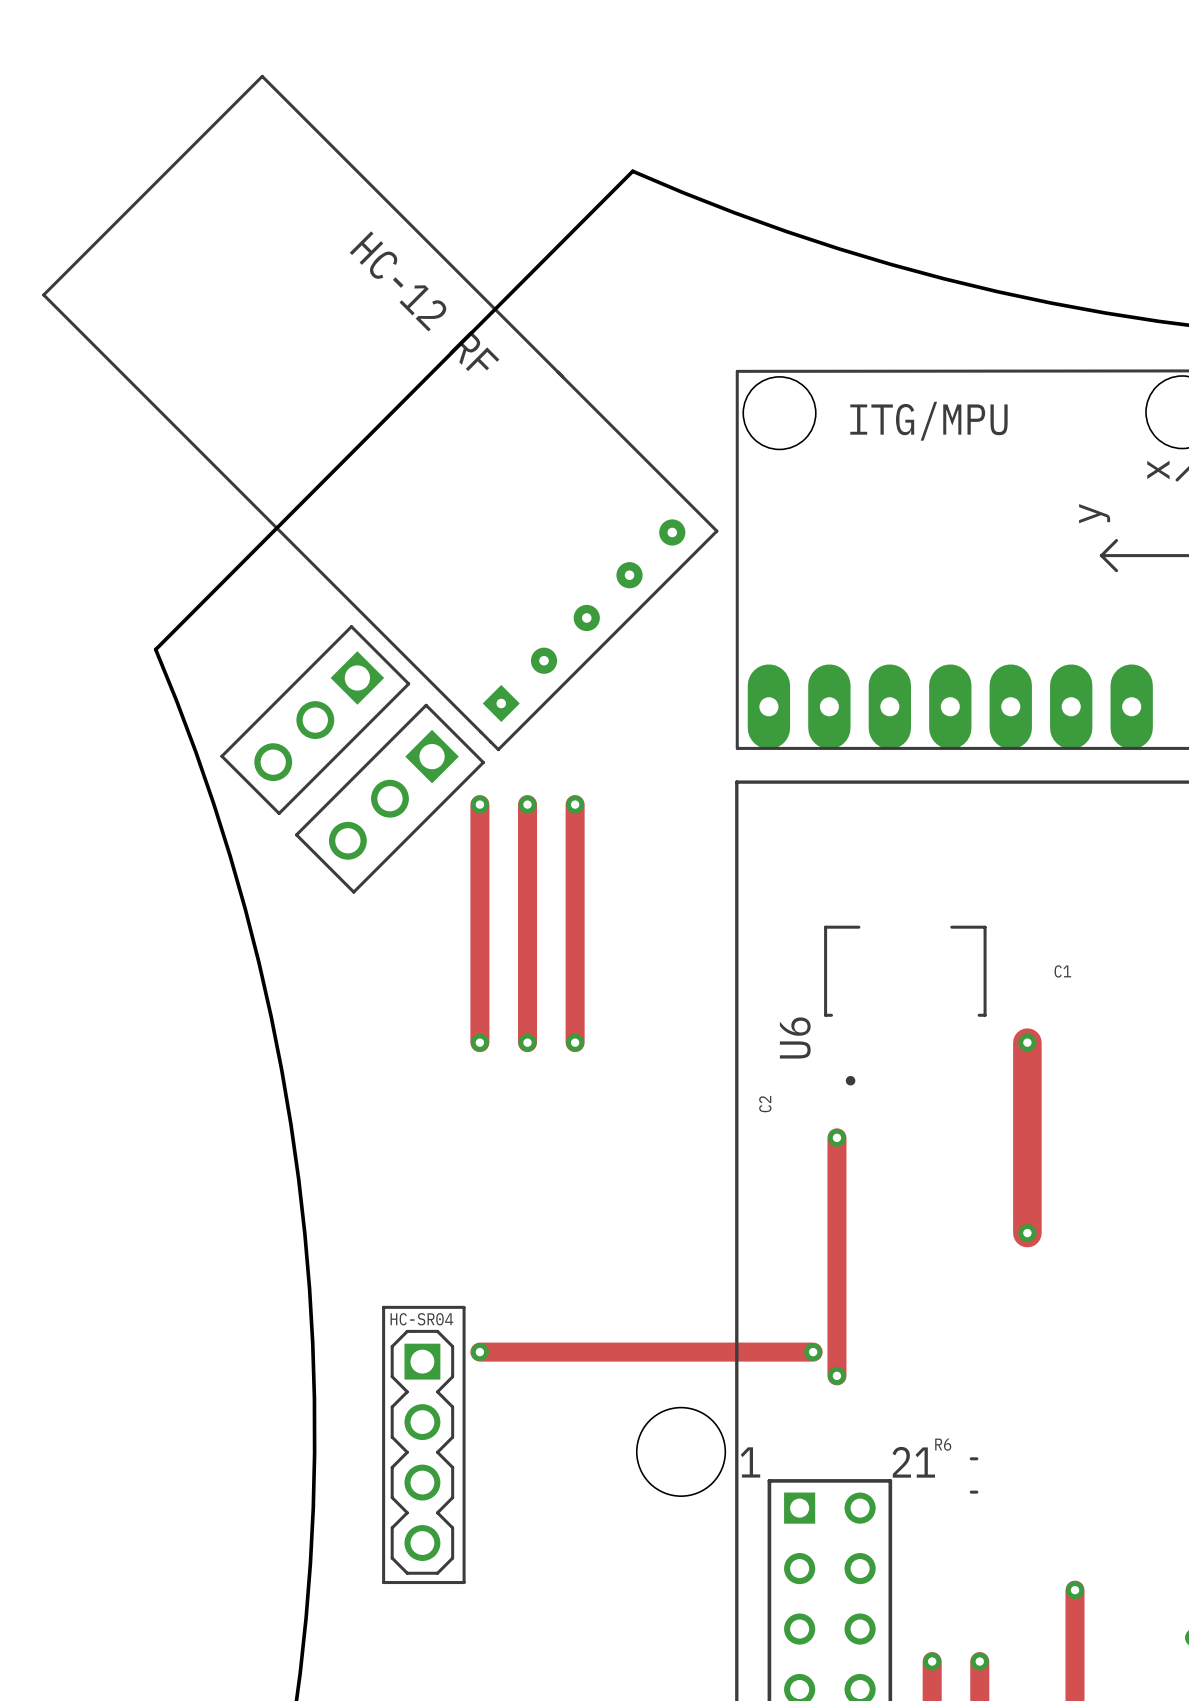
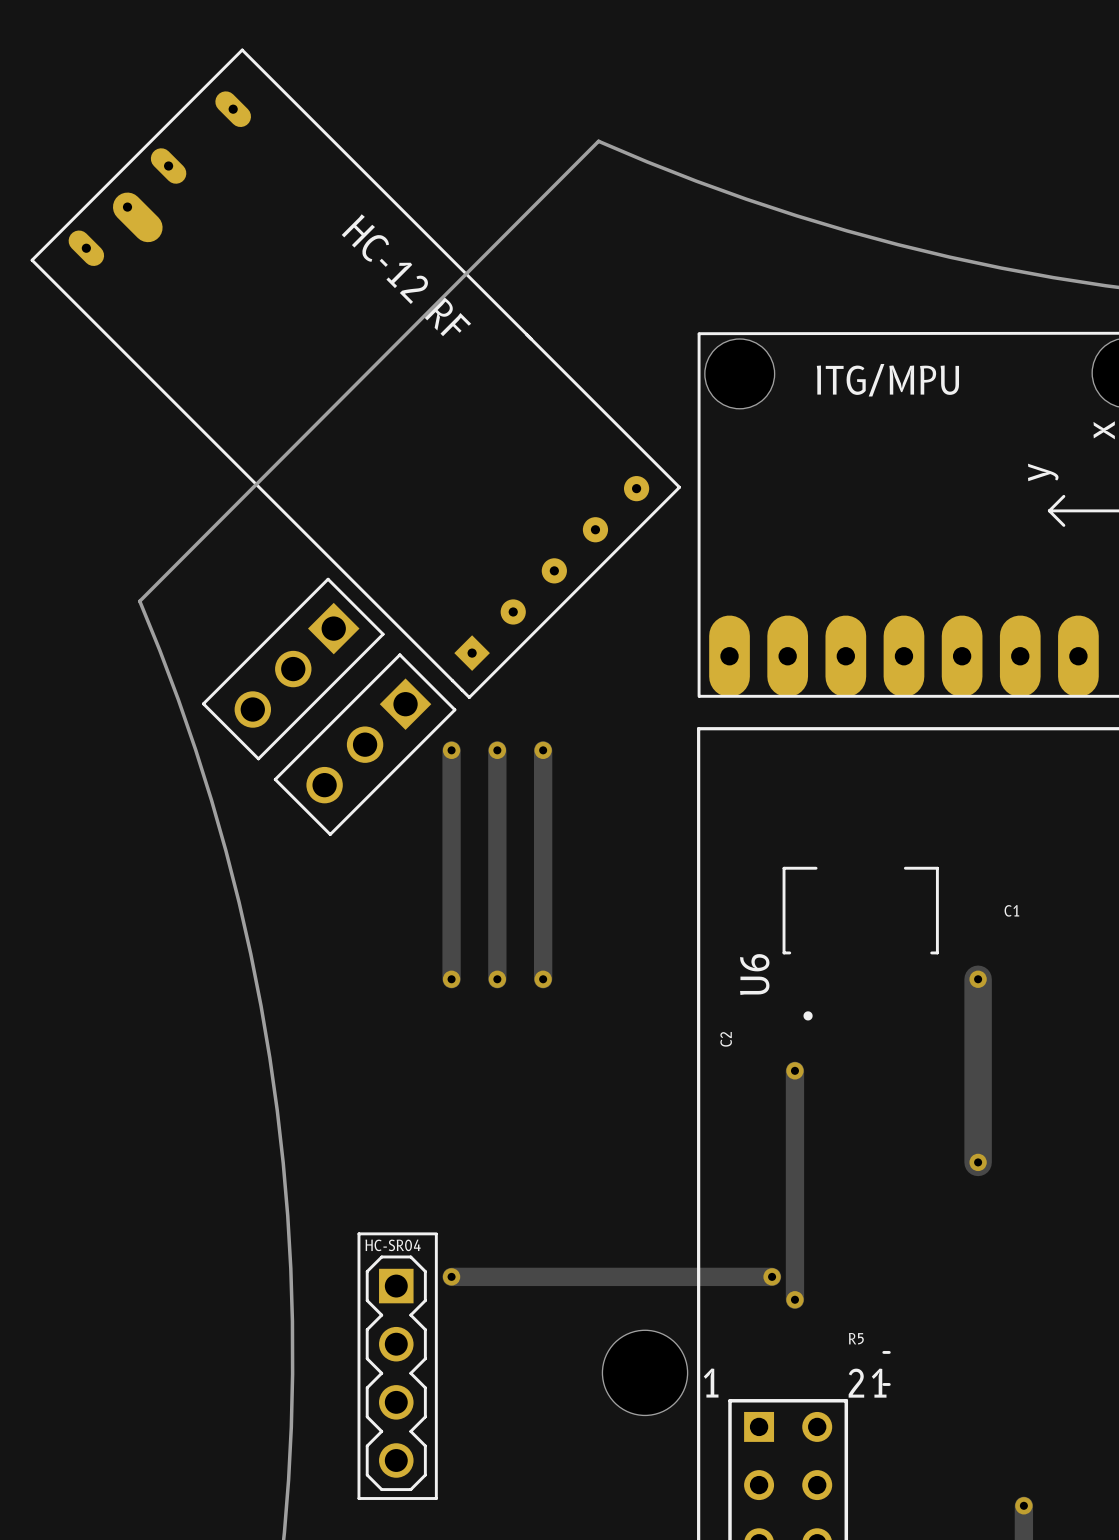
part footprint: [42, 74, 719, 752] -> [30, 48, 681, 699]
R5: none -> (886, 1368)
R6: (974, 1475) -> none

